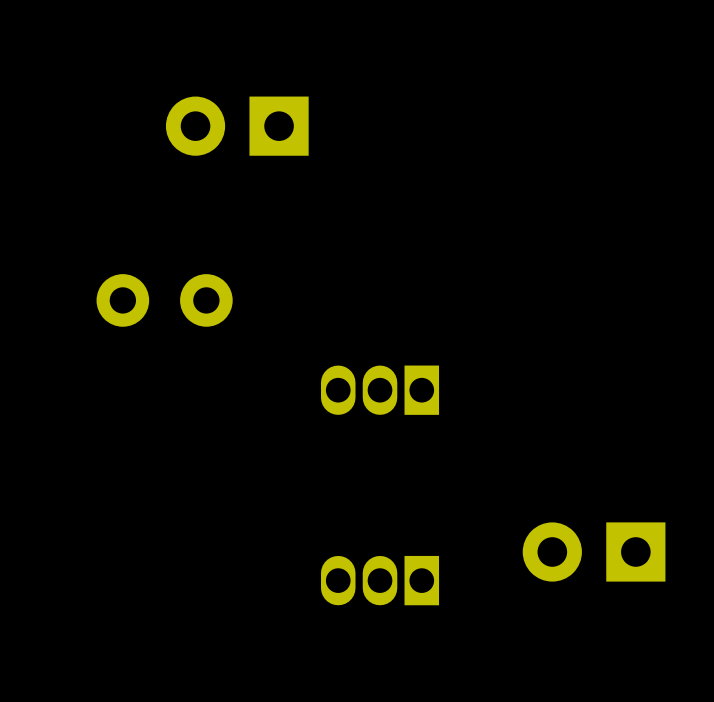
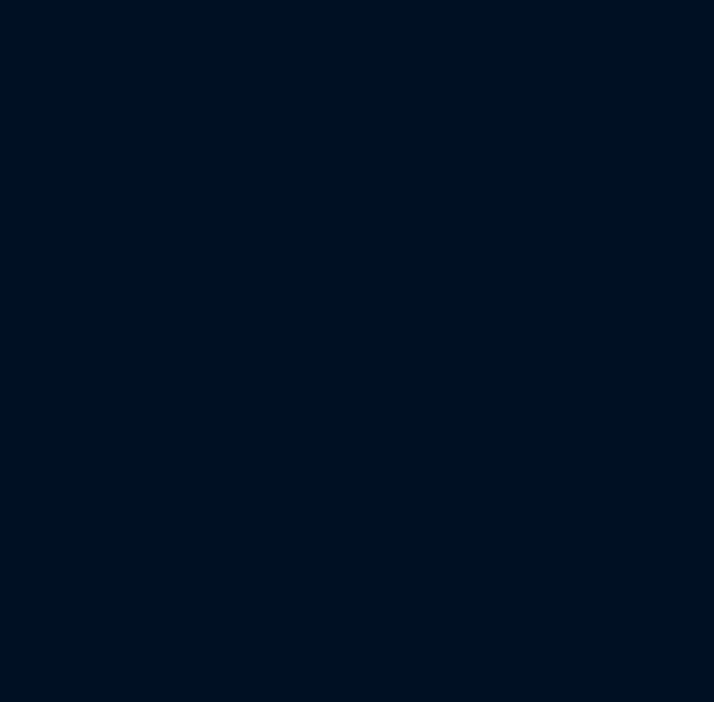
part: (237, 126) -> none
part: (164, 300) -> none
part: (380, 390) -> none
part: (594, 551) -> none
part: (380, 580) -> none

